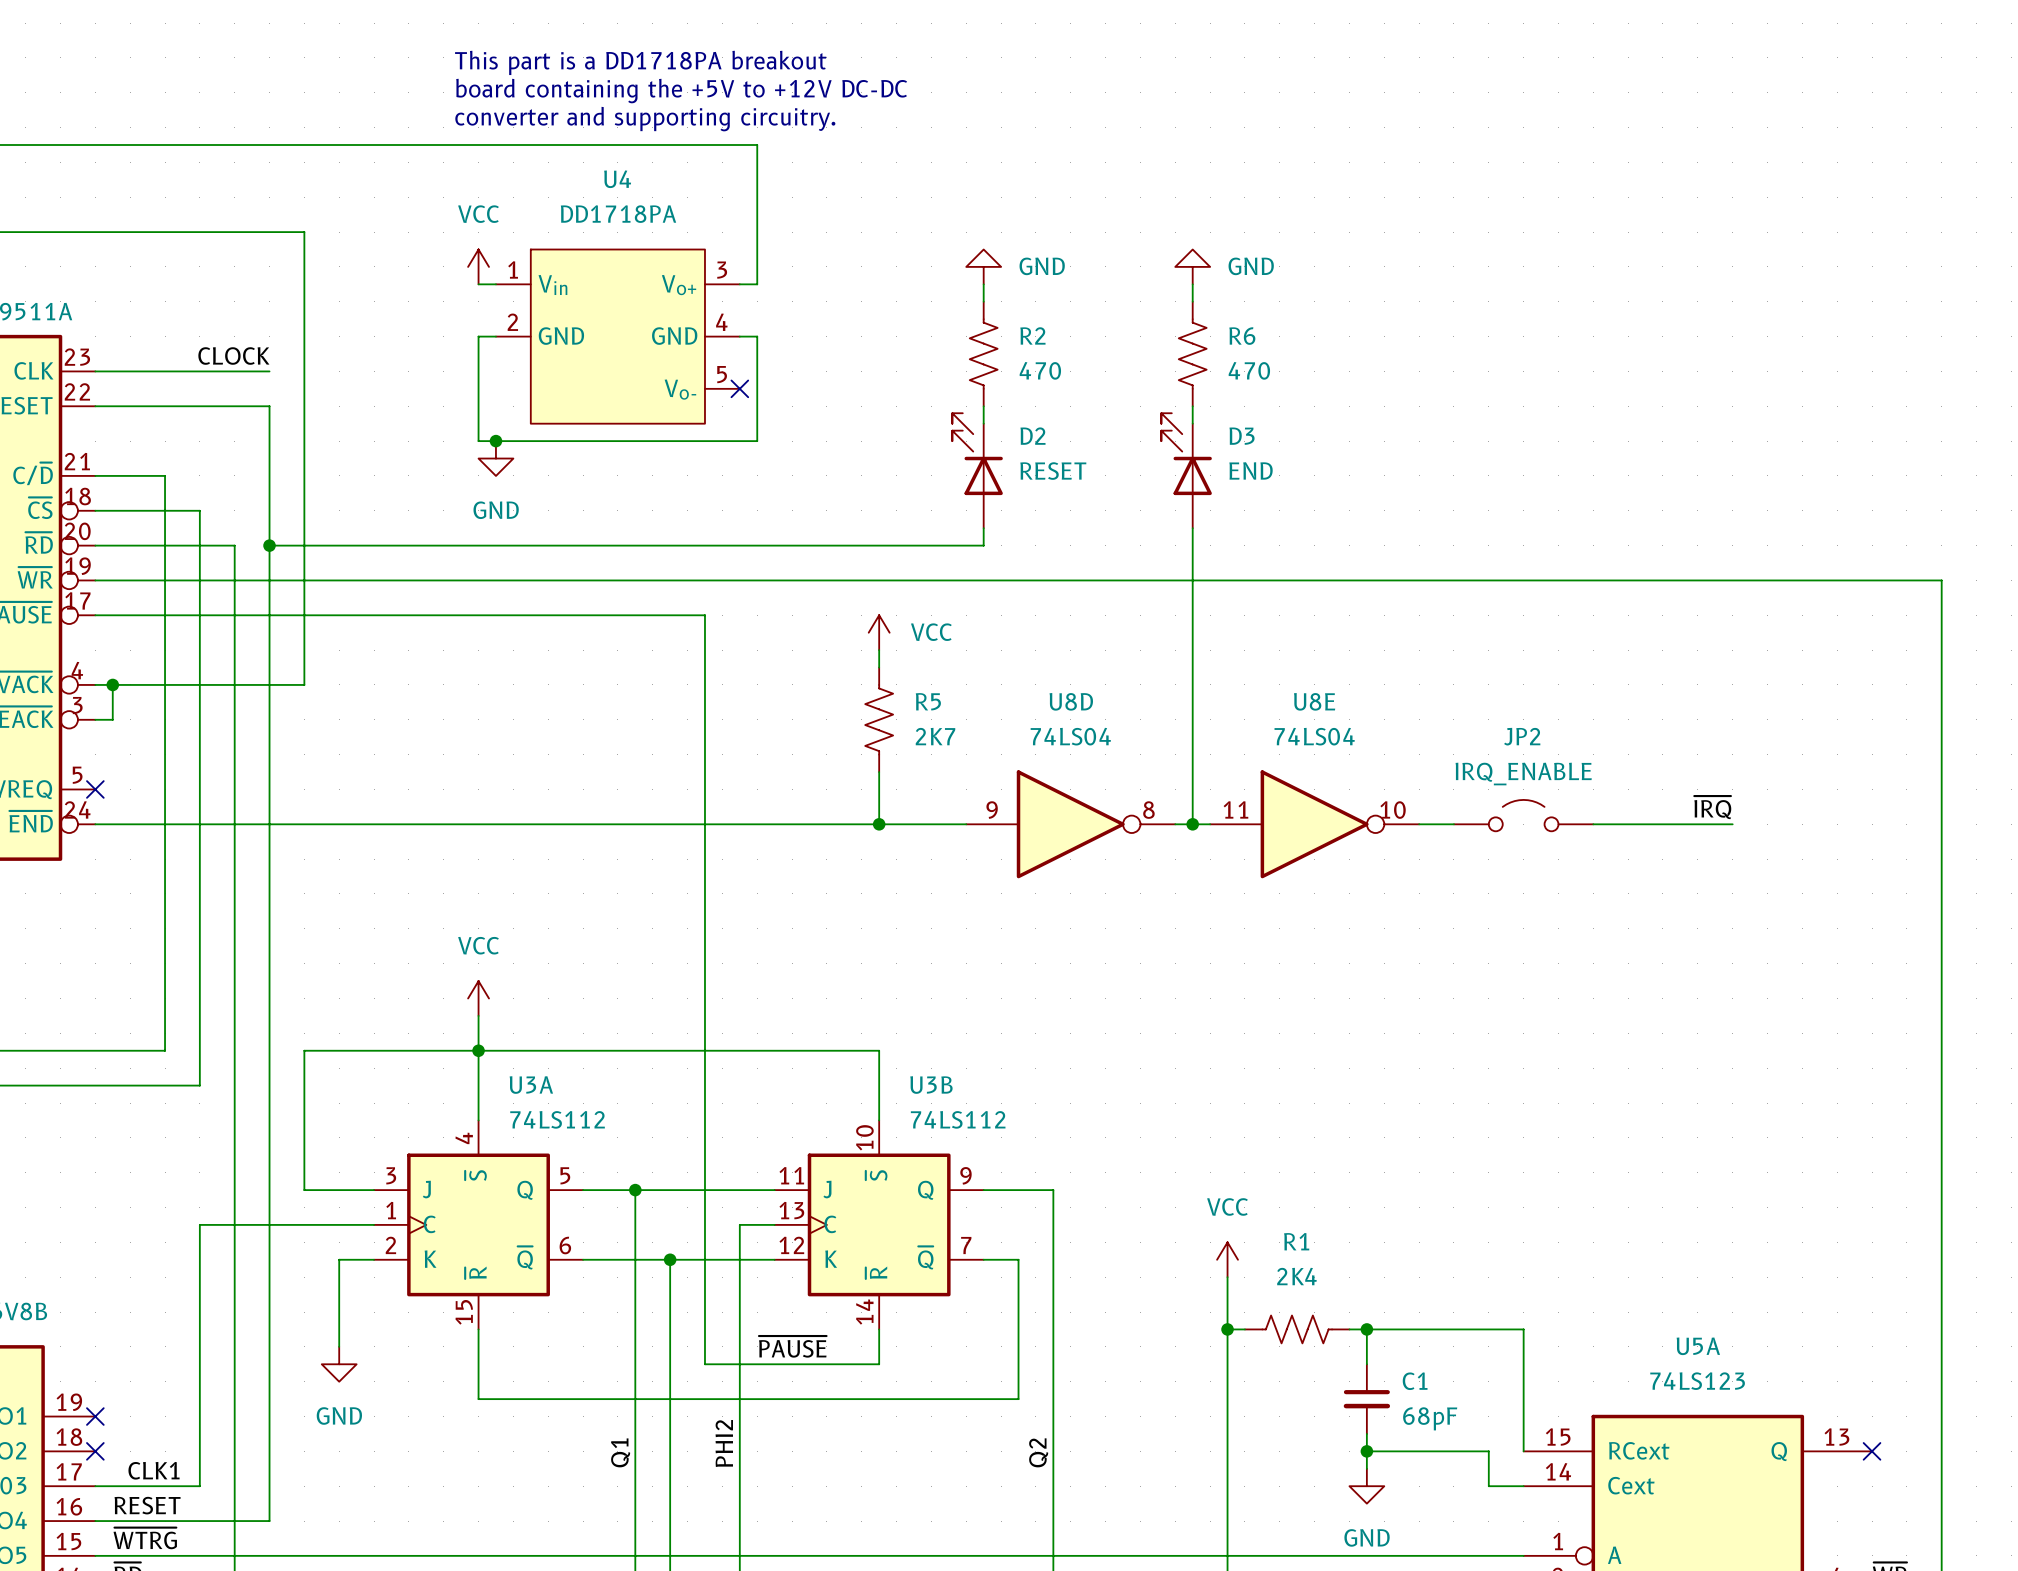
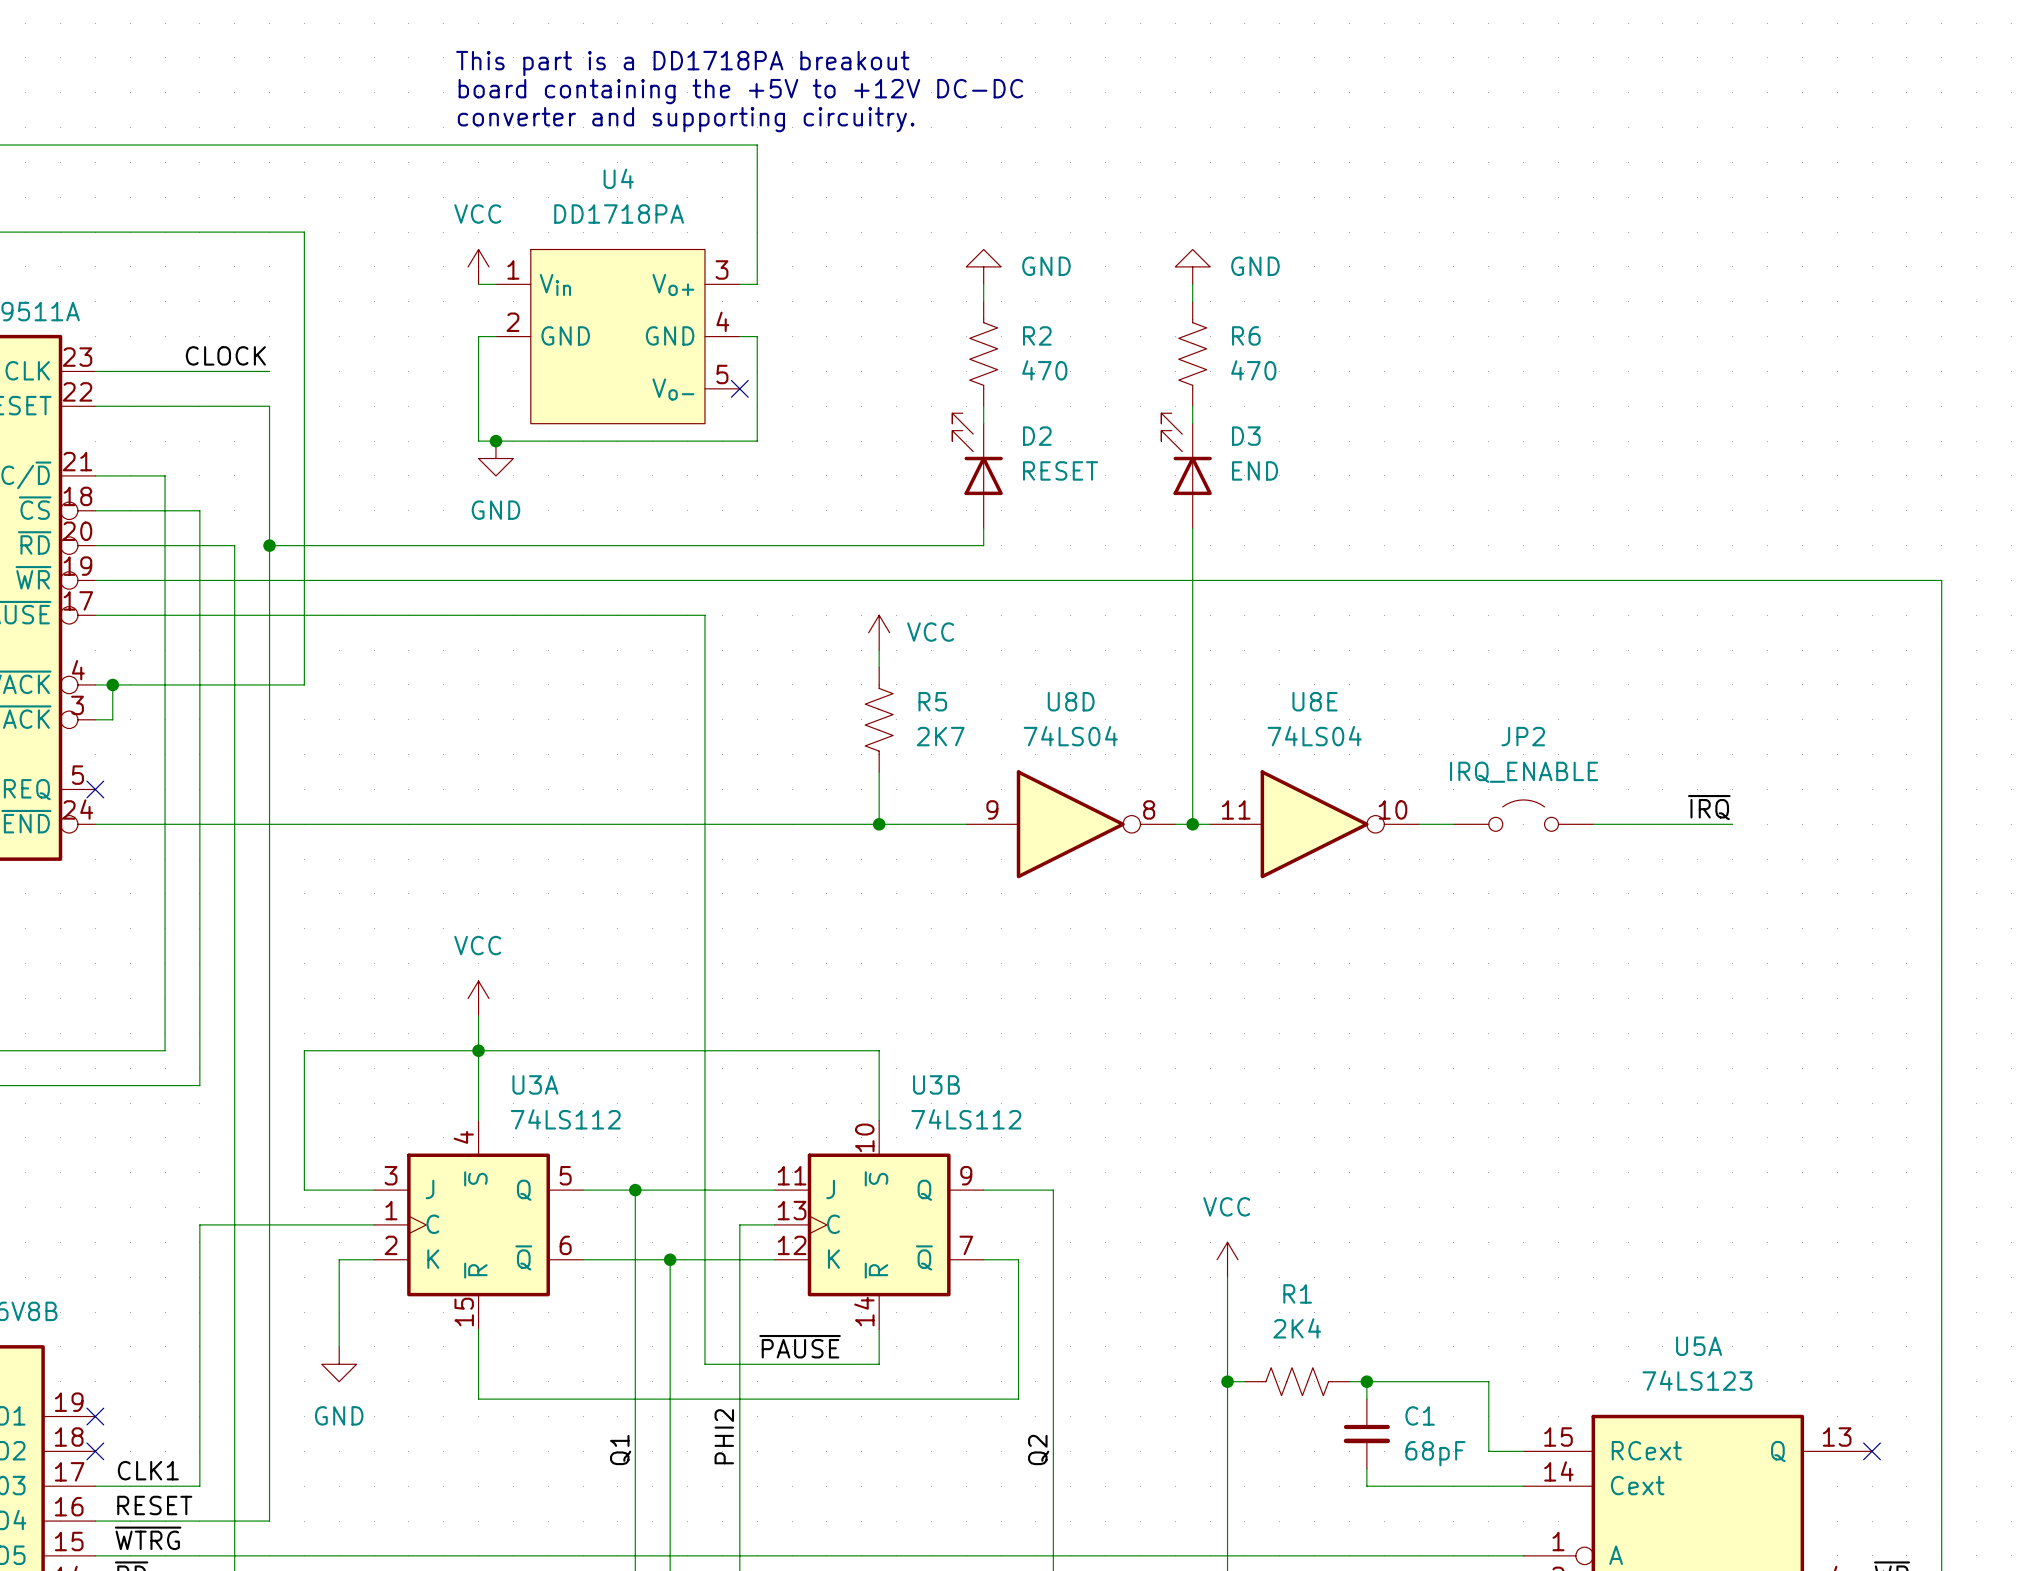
wire: (1227, 1329) (1244, 1329) -> (1227, 1381) (1244, 1381)
junction position: (1227, 1329) -> (1227, 1381)
R1 position: (1297, 1329) -> (1297, 1381)
wire: (1349, 1329) (1523, 1329) (1523, 1451) -> (1349, 1381) (1488, 1381) (1488, 1451) (1523, 1451)
wire: (1366, 1329) (1366, 1364) -> none
junction: (1366, 1329) -> none
junction: none -> (1366, 1381)
C1 position: (1366, 1399) -> (1366, 1433)
wire: (1366, 1451) (1488, 1451) (1488, 1486) -> (1366, 1468) (1366, 1486) (1488, 1486)
junction: (1366, 1451) -> none
power symbol: GND (1366, 1486) -> none

